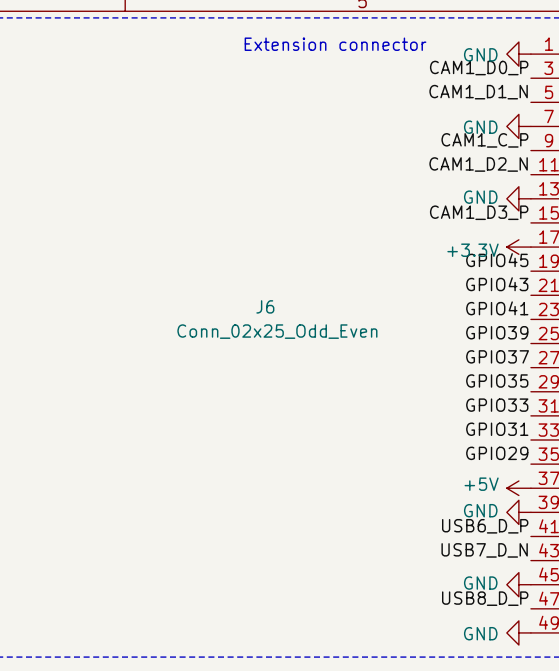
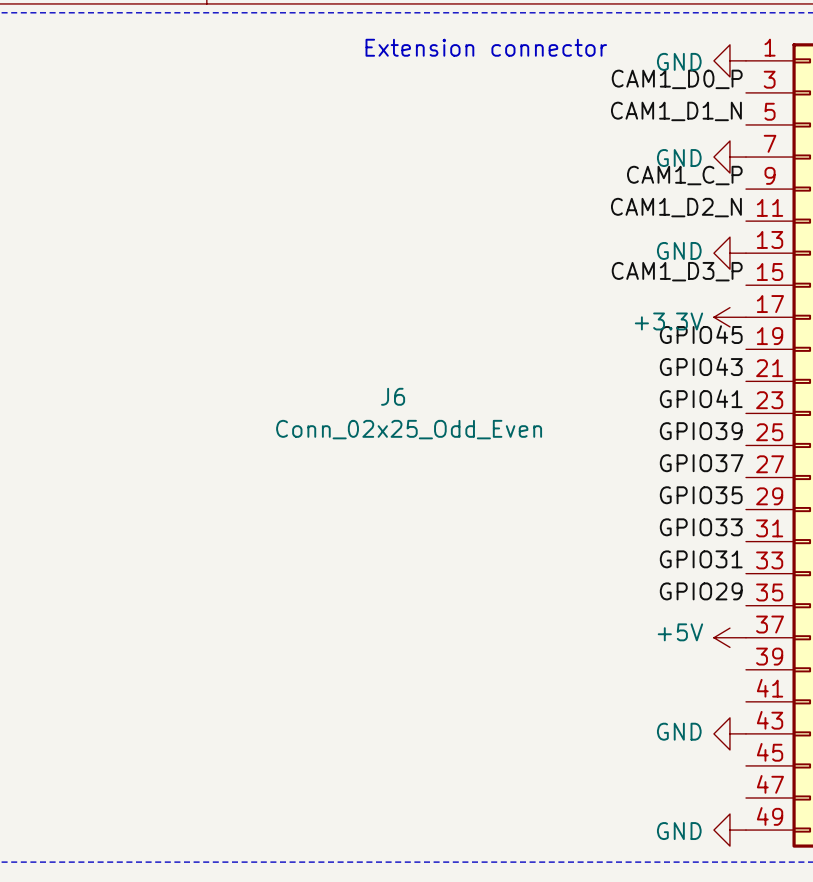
power symbol: GND (518, 512) -> none
label: USB6_D_P (485, 526) -> none
label: USB7_D_N (484, 550) -> none
power symbol: none -> GND (729, 733)
power symbol: GND (518, 584) -> none
label: USB8_D_P (485, 598) -> none

